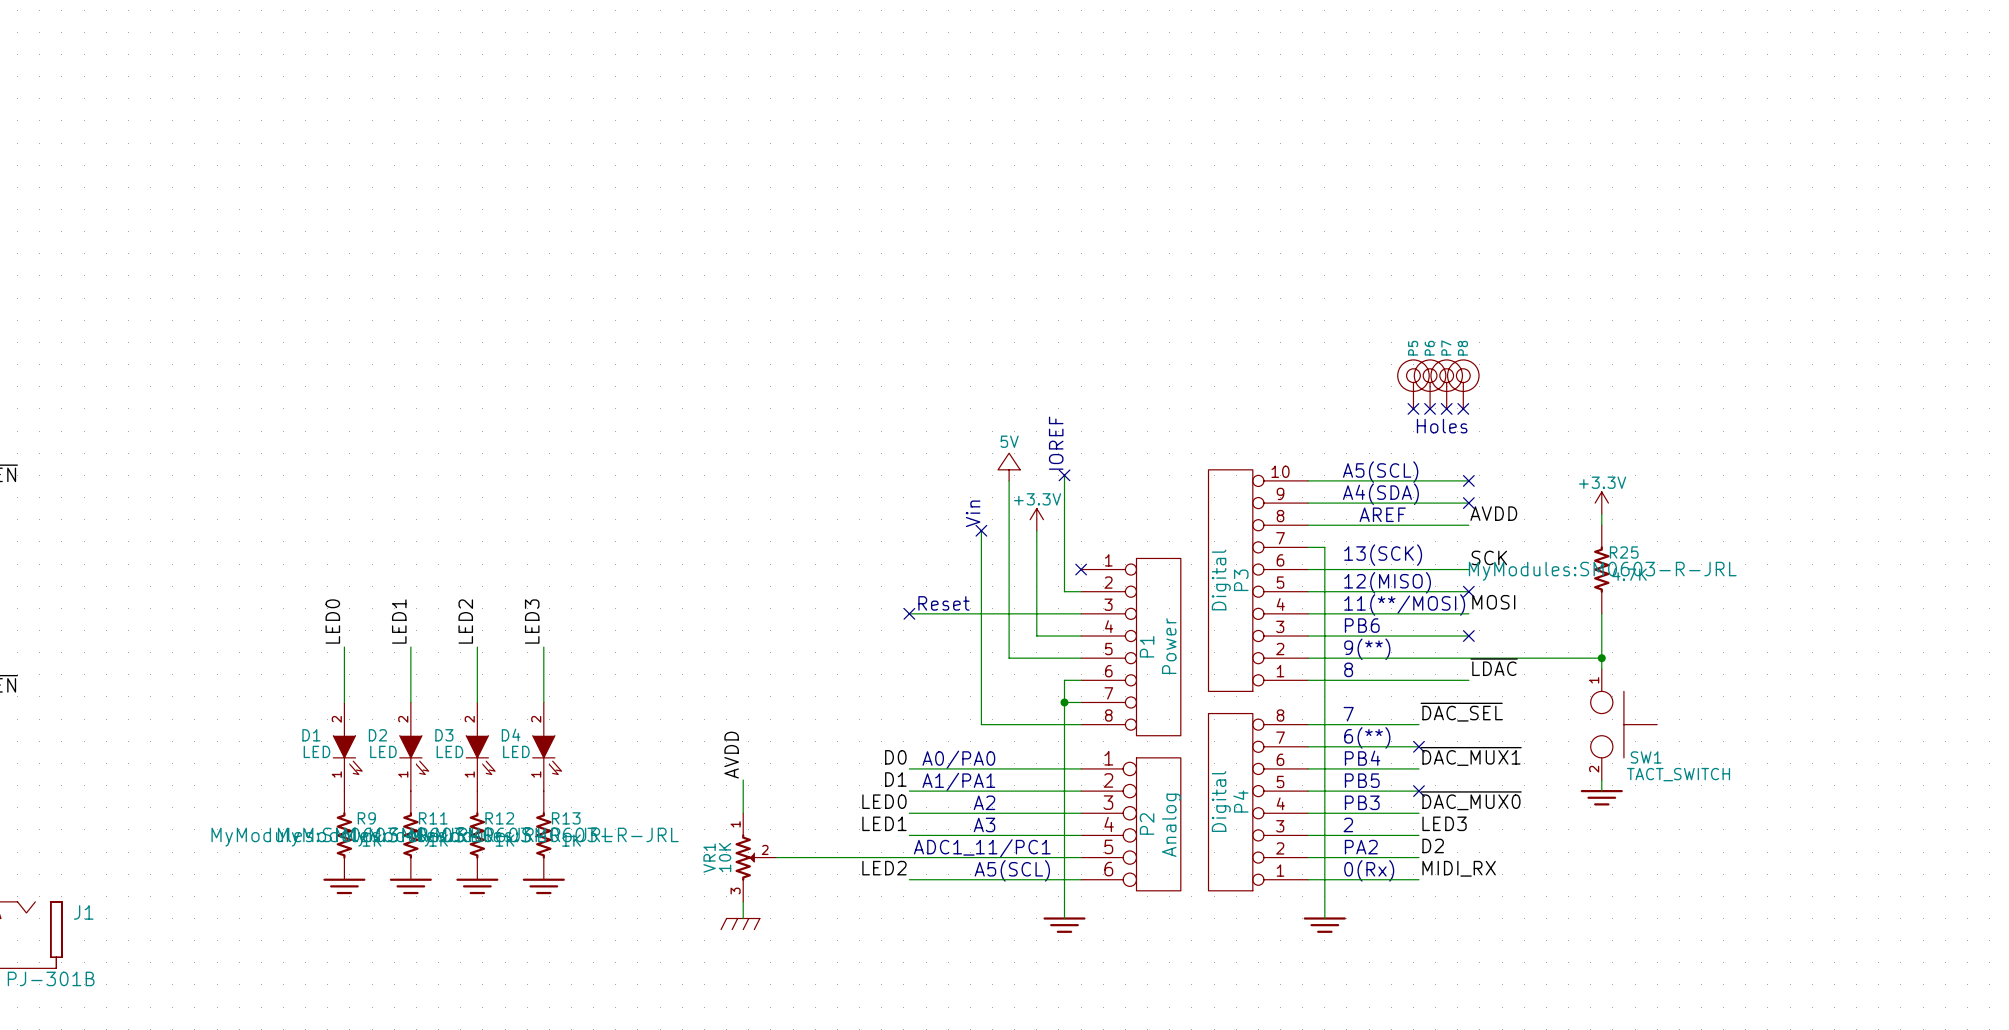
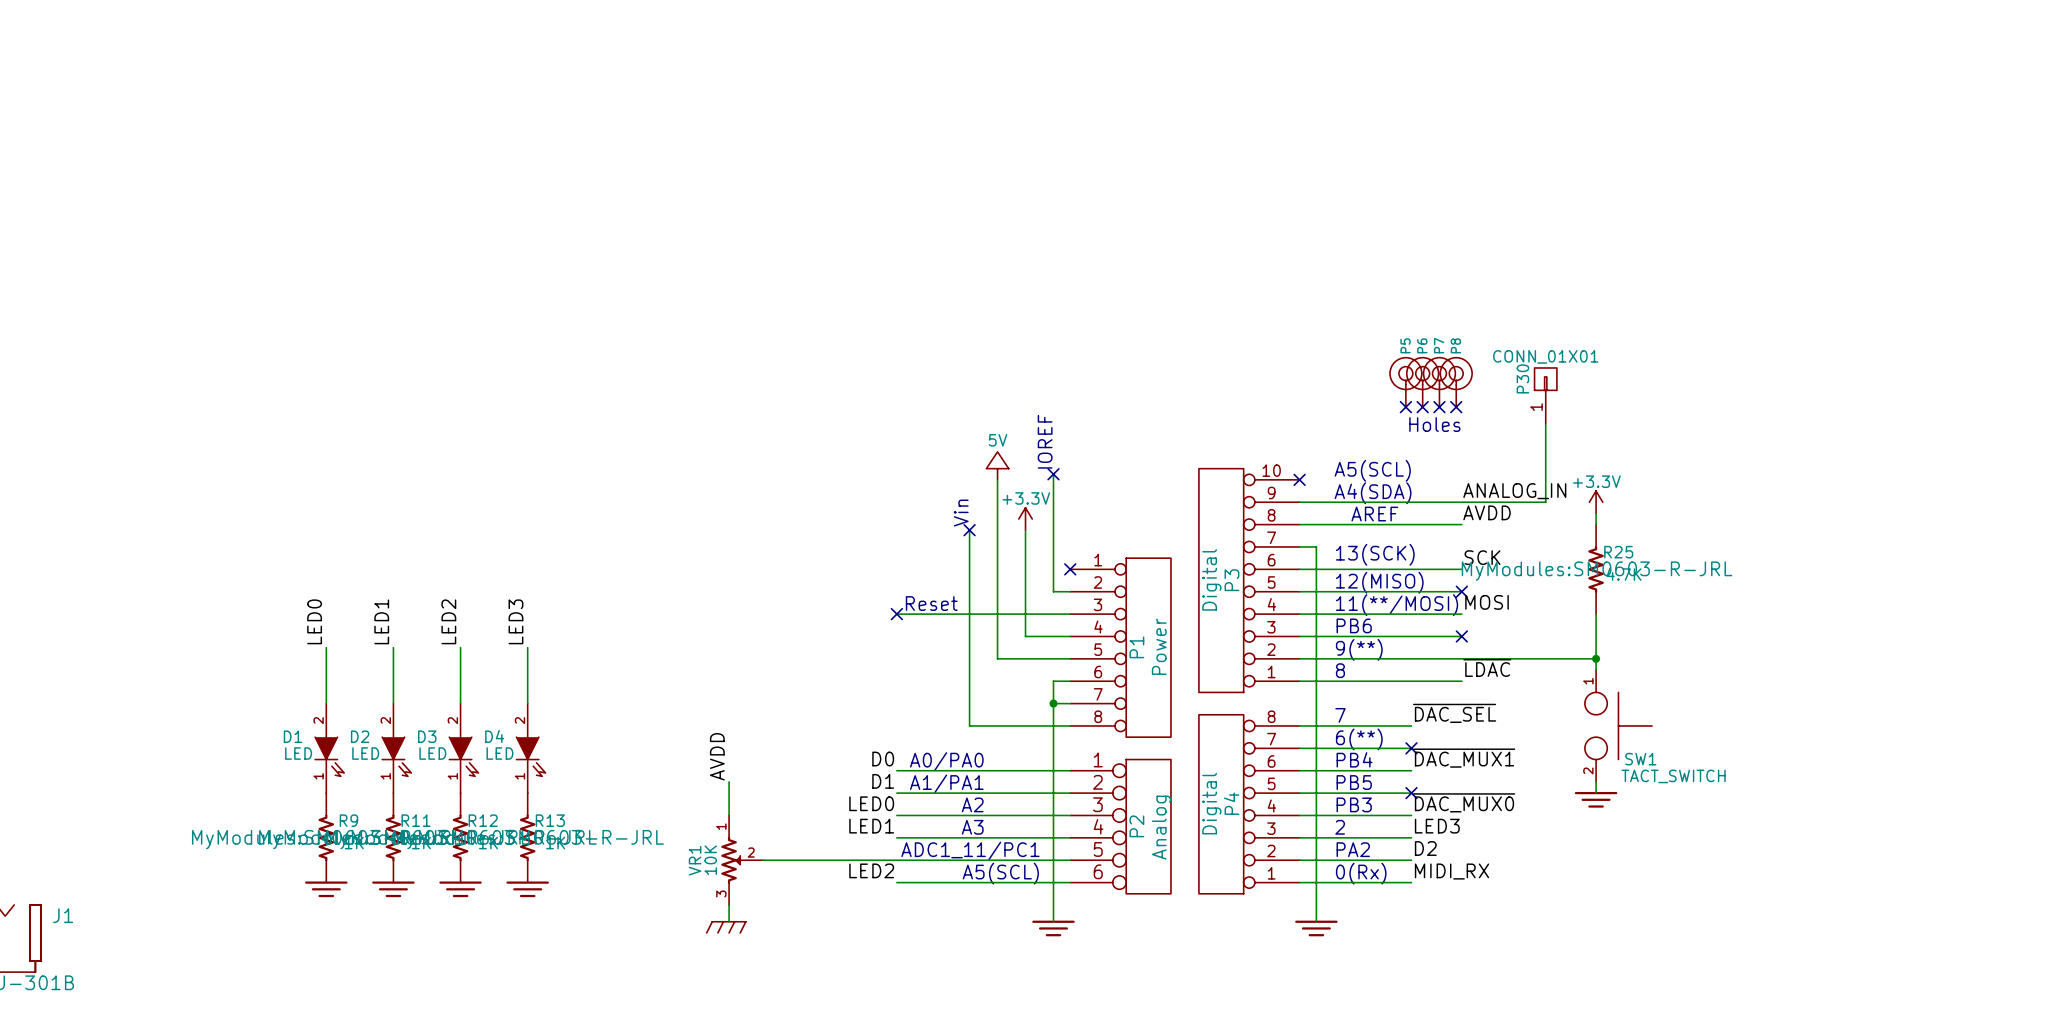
P30: none -> CONN_01X01 (1545, 395)
wire: none -> (1545, 423) (1545, 502) (1461, 502)
wire: (1308, 480) (1468, 480) -> none
no-connect mark: none -> (1299, 479)
no-connect mark: (1468, 480) -> none
label: none -> ANALOG_IN (1514, 491)
no-connect mark: (1468, 503) -> none

